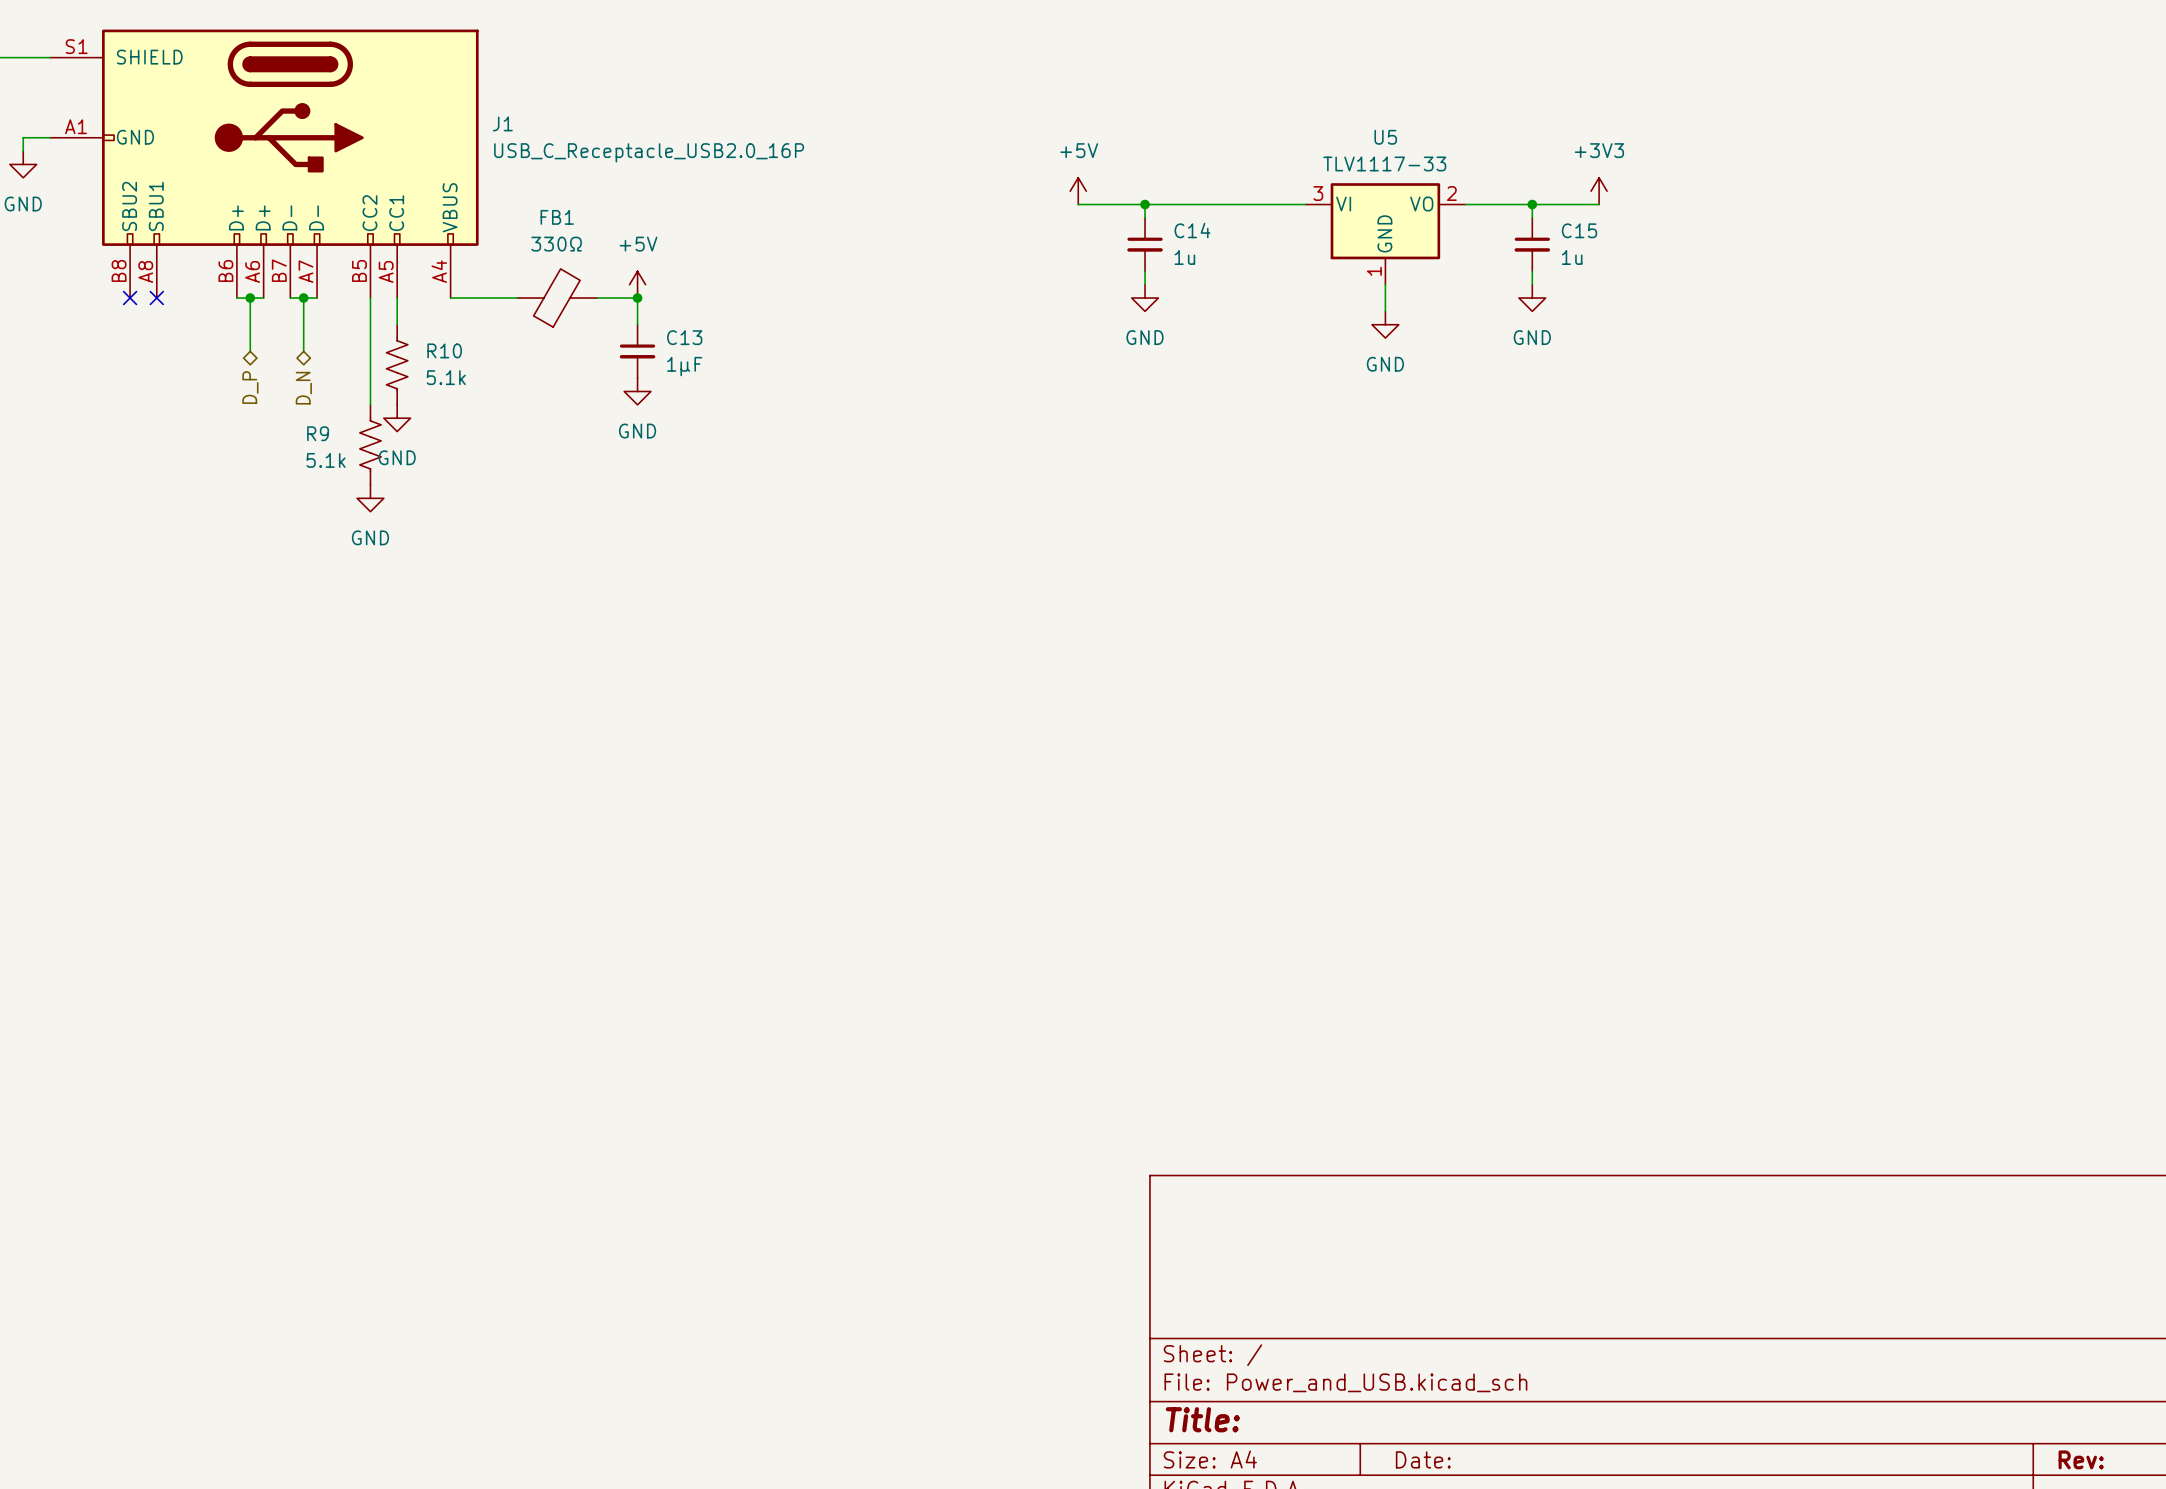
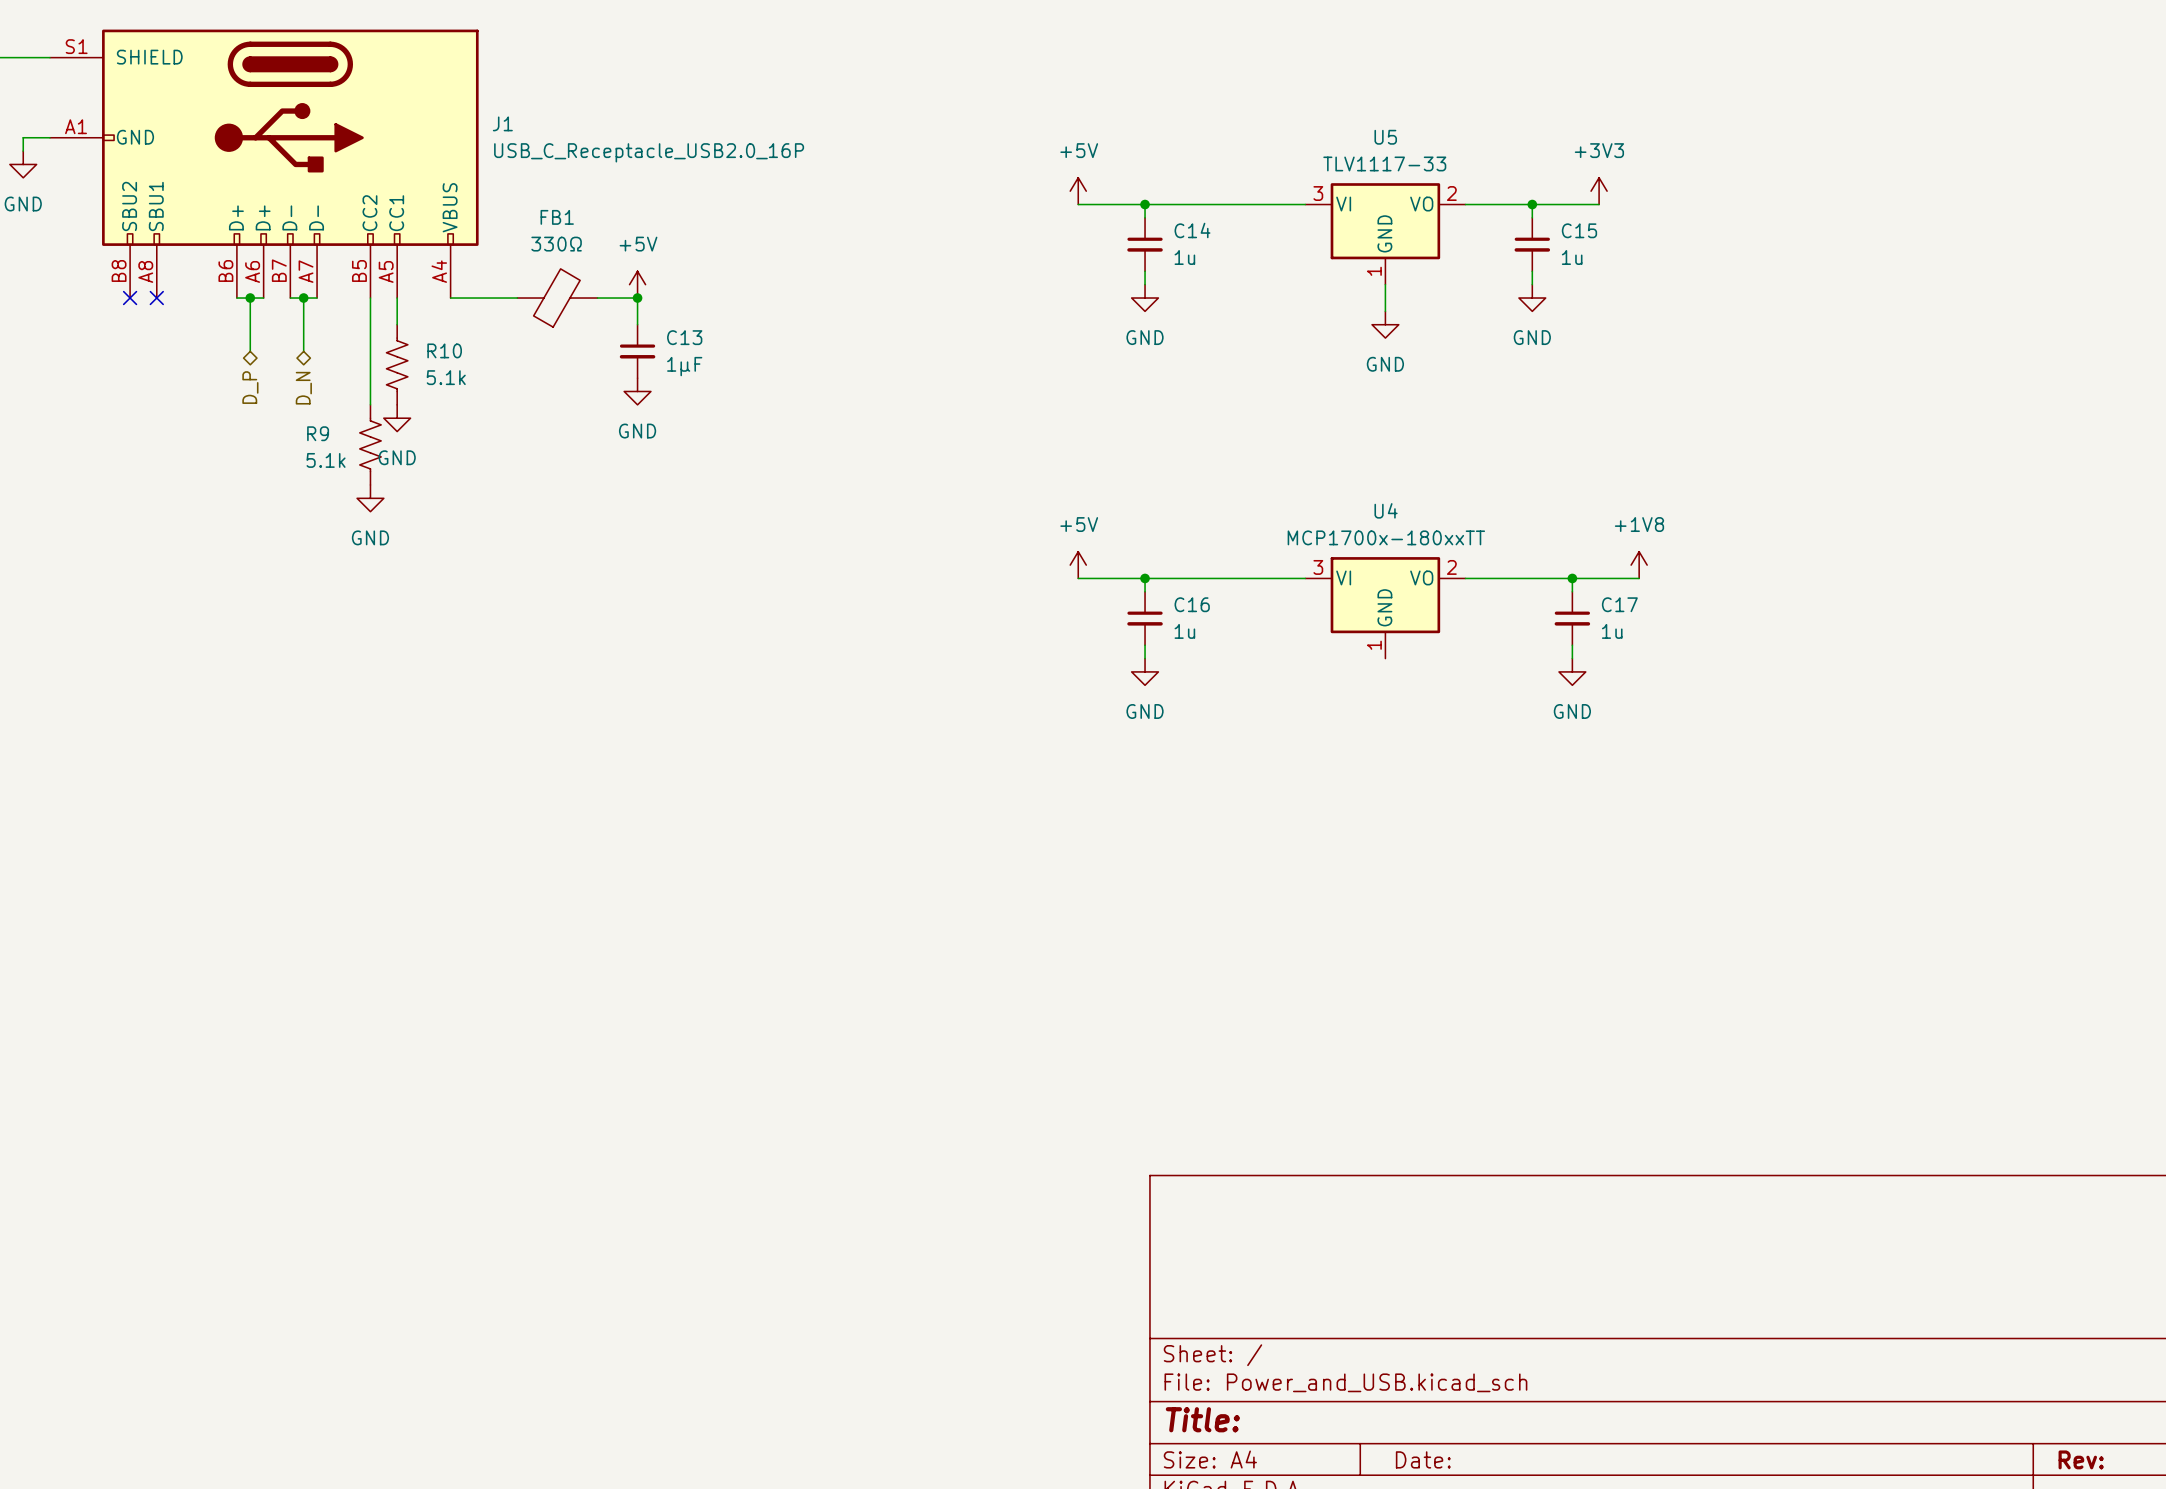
power symbol: none -> +5V (1078, 565)
power symbol: none -> +1V8 (1639, 565)
wire: none -> (1078, 578) (1305, 578)
wire: none -> (1145, 578) (1145, 591)
junction: none -> (1145, 578)
wire: none -> (1465, 578) (1639, 578)
wire: none -> (1572, 578) (1572, 591)
junction: none -> (1572, 578)
U4: none -> MCP1700x-180xxTT (1385, 607)
C16: none -> 1u (1145, 618)
C17: none -> 1u (1572, 618)
wire: none -> (1145, 645) (1145, 658)
wire: none -> (1572, 645) (1572, 658)
power symbol: none -> GND (1145, 671)
power symbol: none -> GND (1572, 671)

